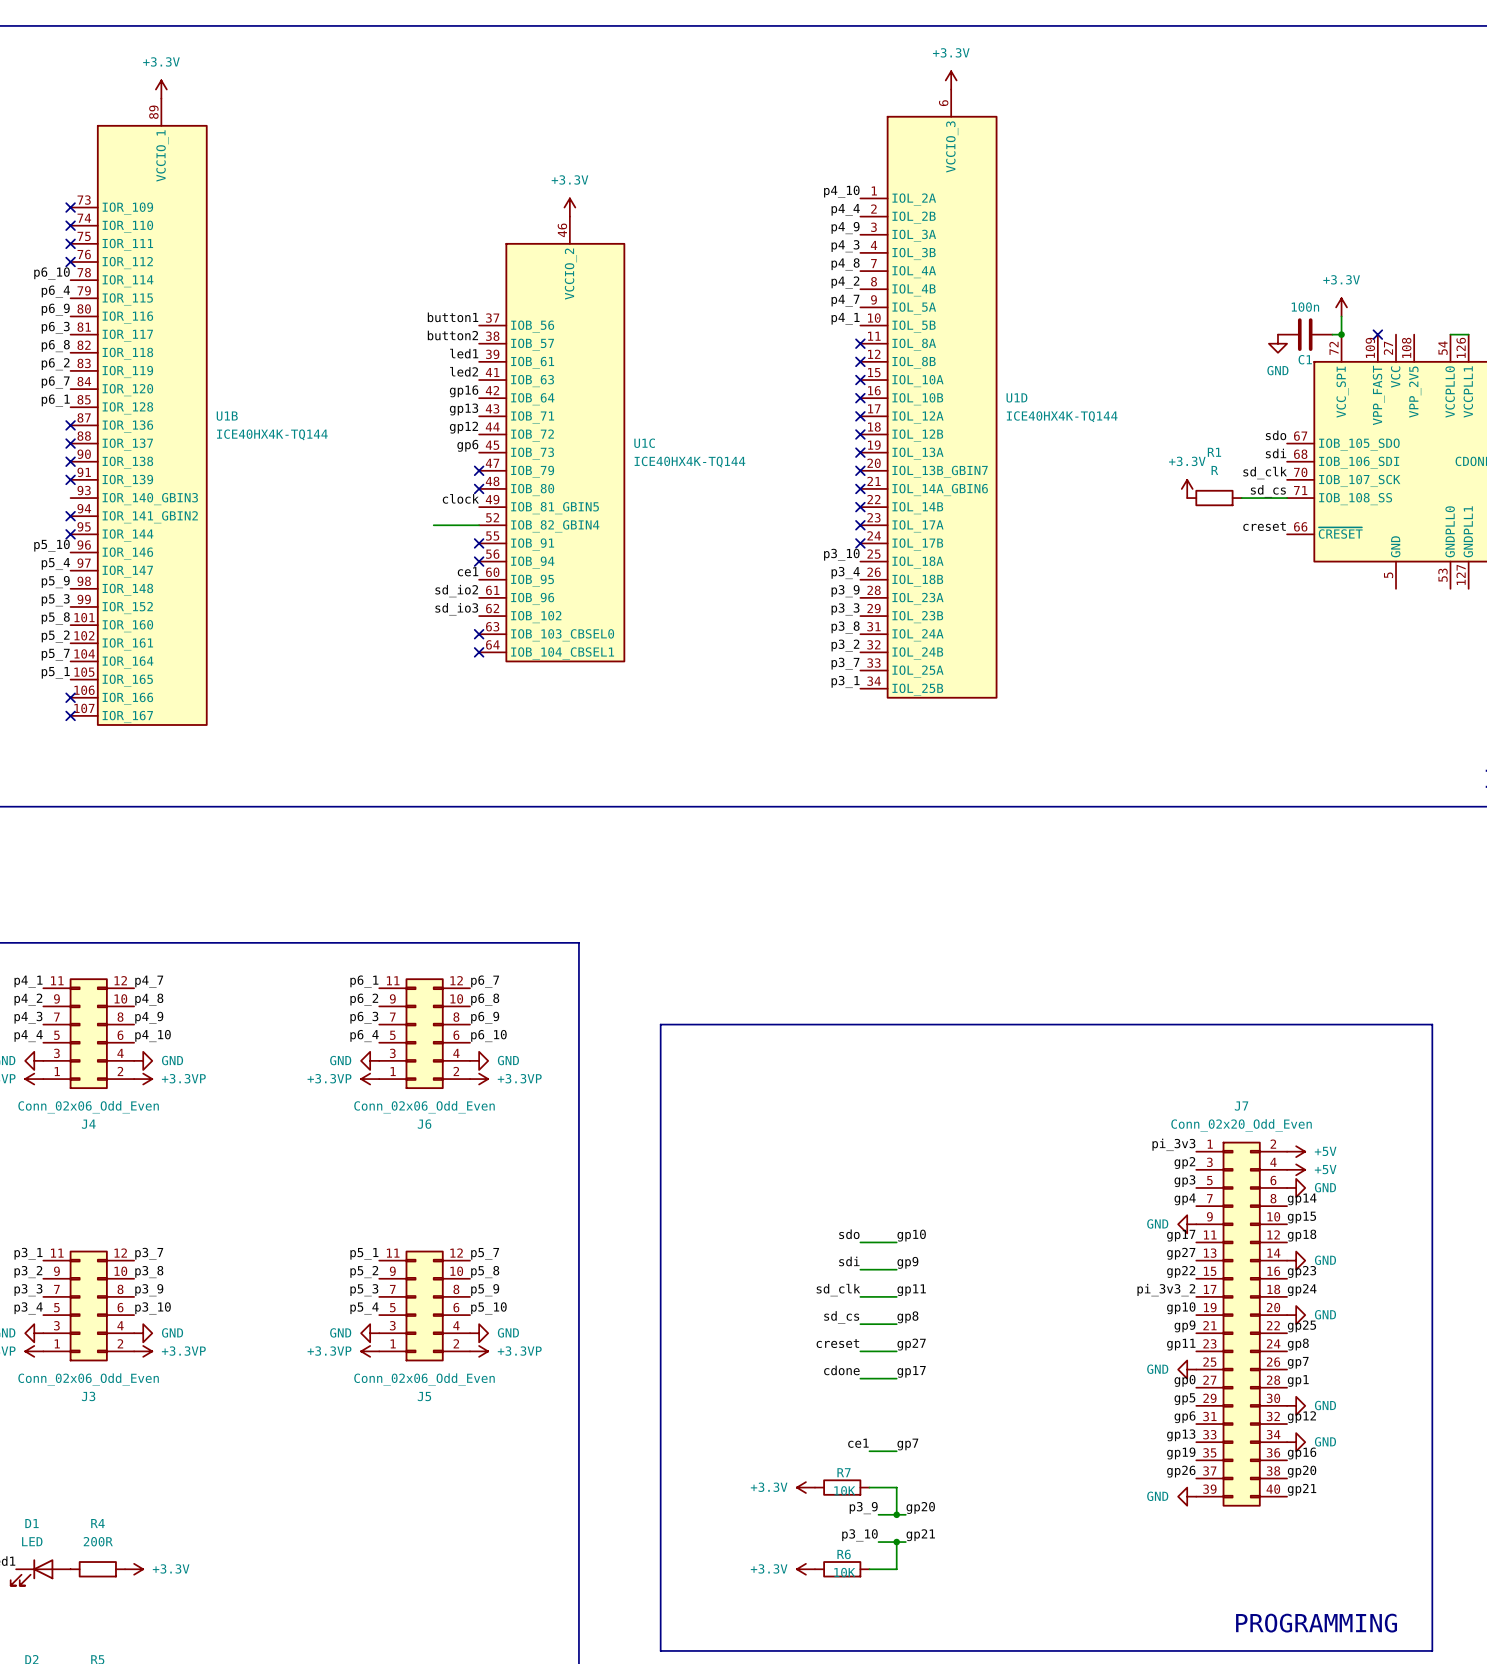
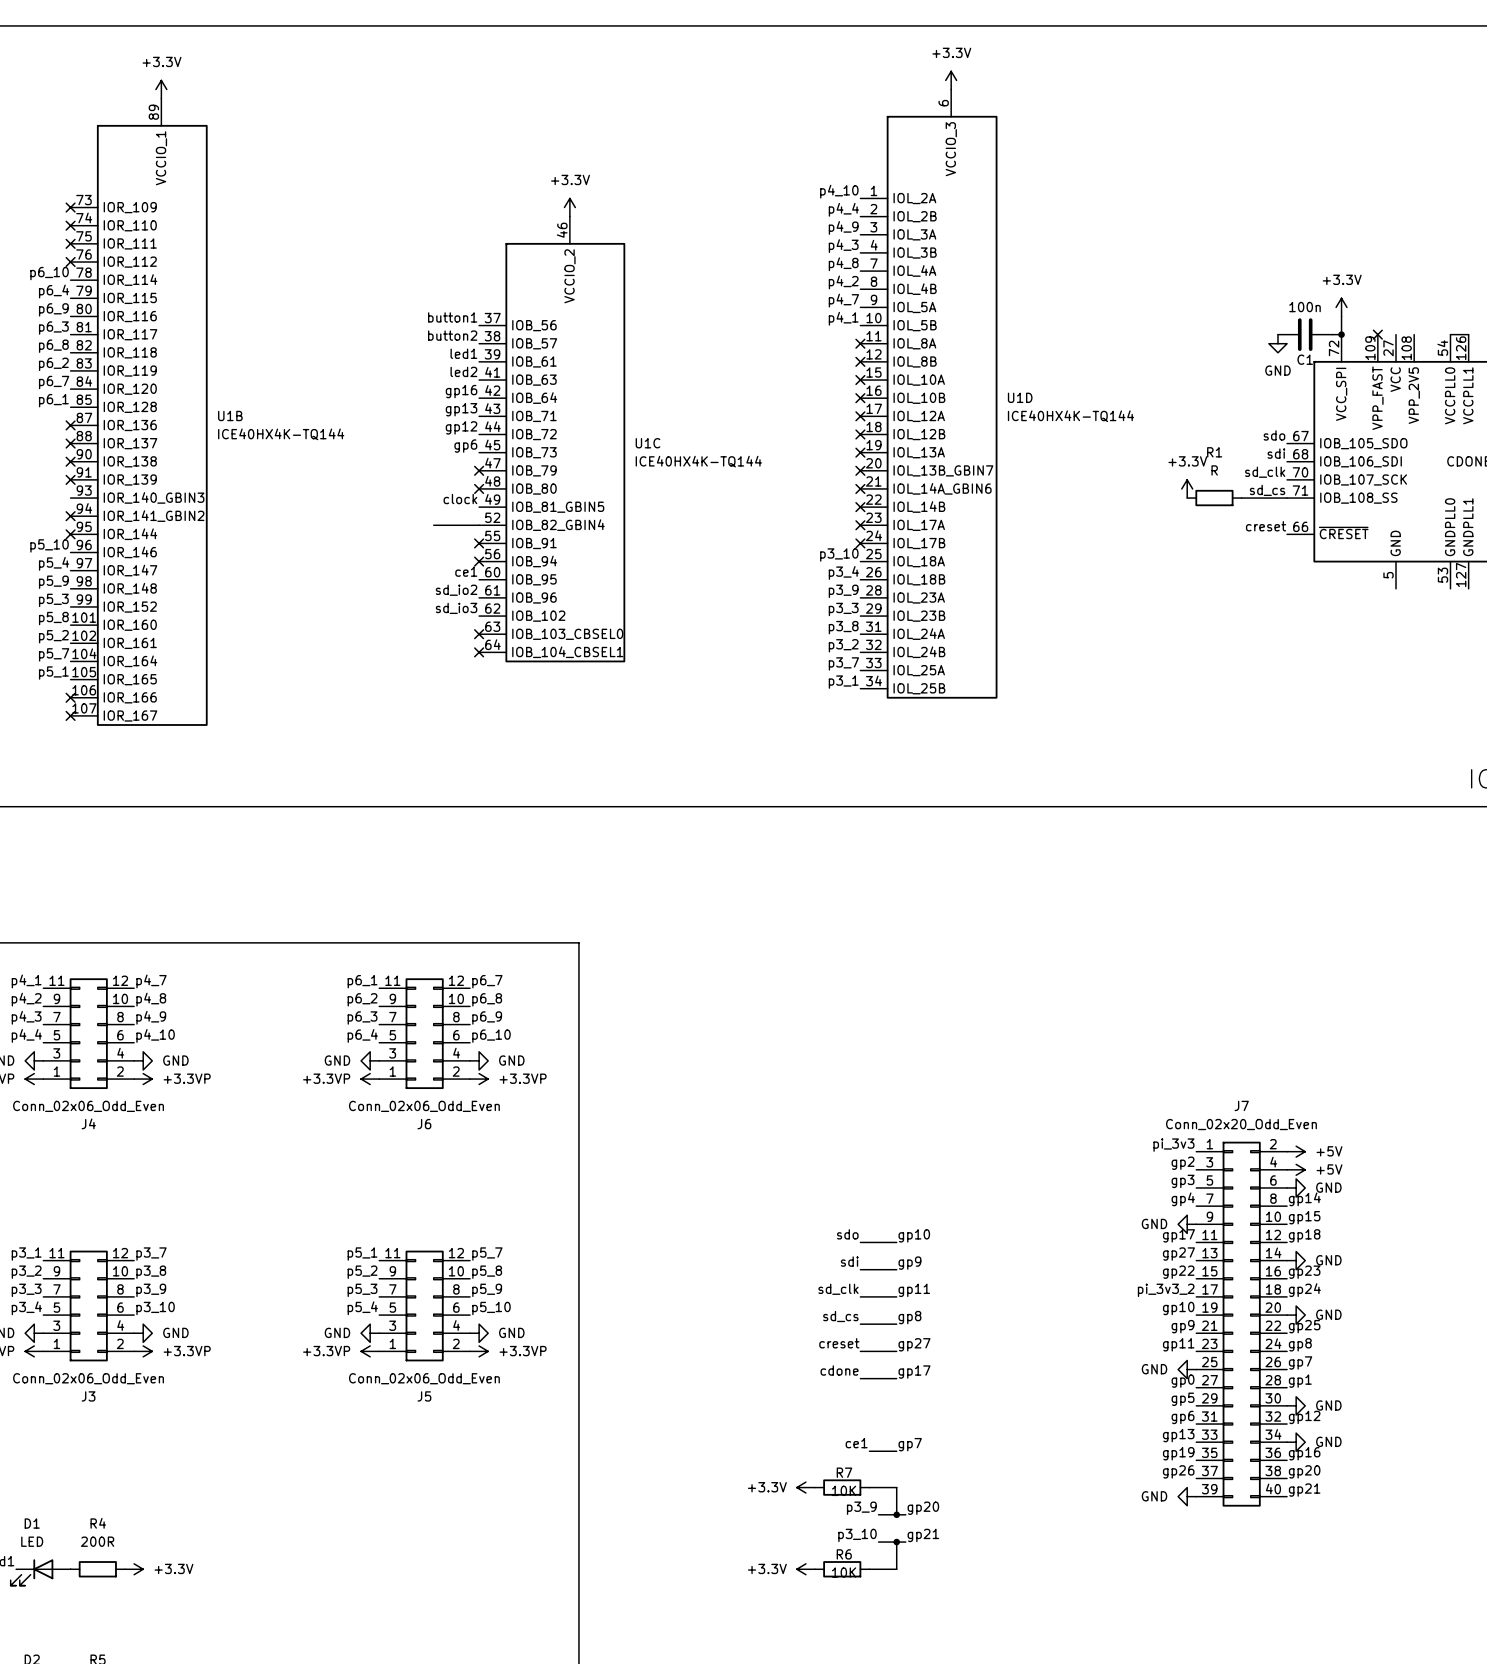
line: (660, 1024) (1432, 1024) (1432, 1650) (660, 1650) (660, 1024) -> none
text: PROGRAMMING (1316, 1623) -> none

